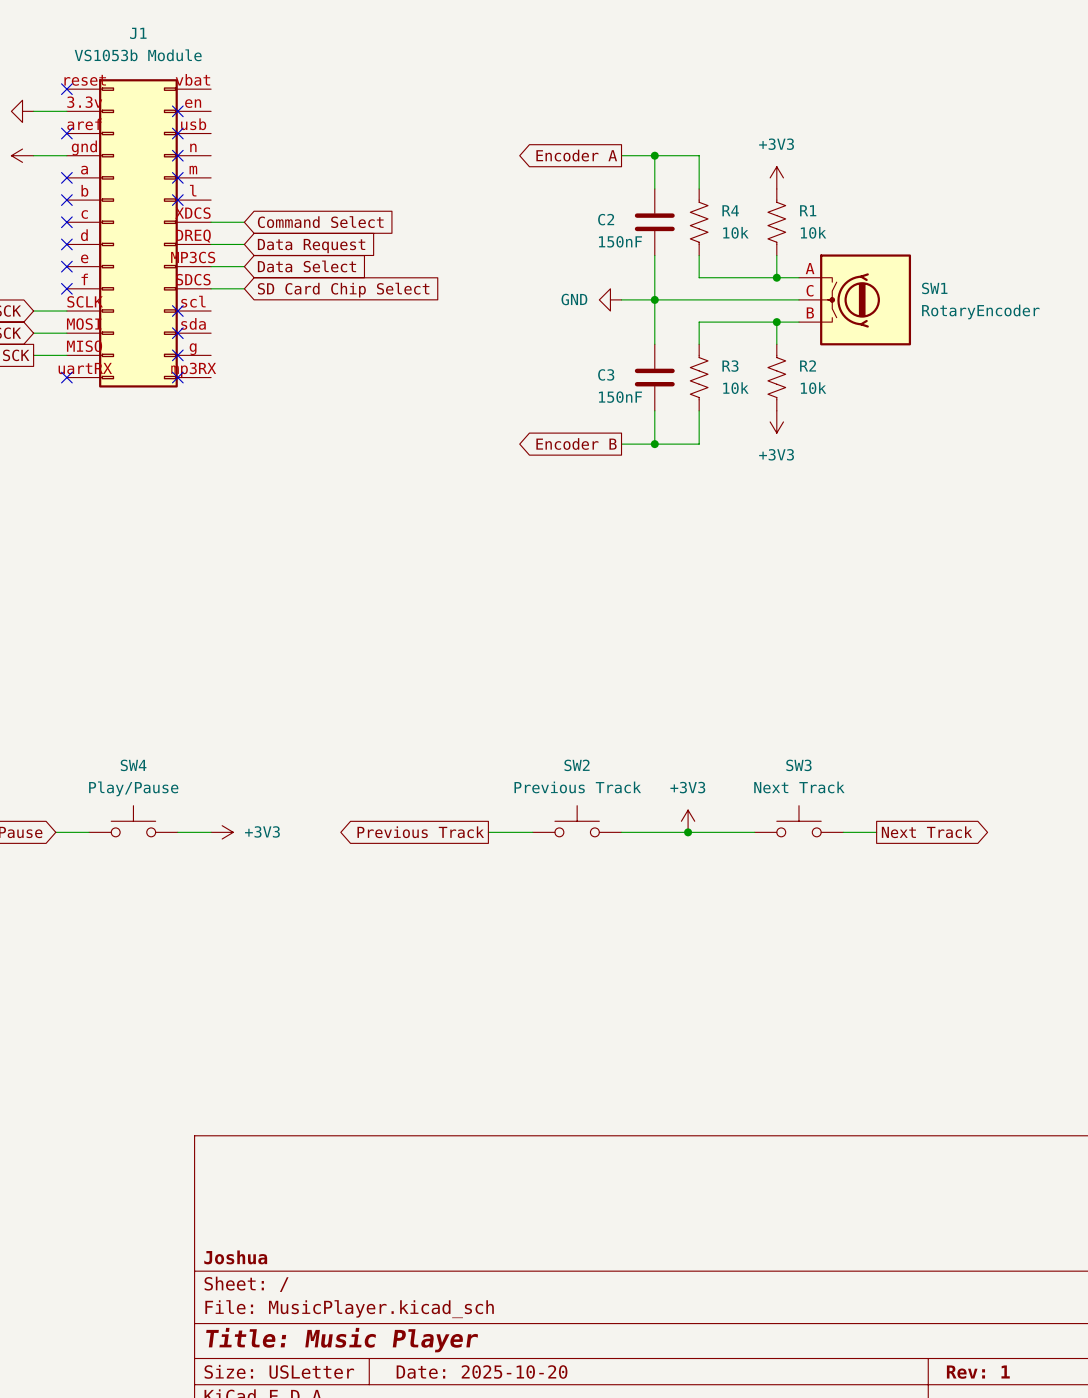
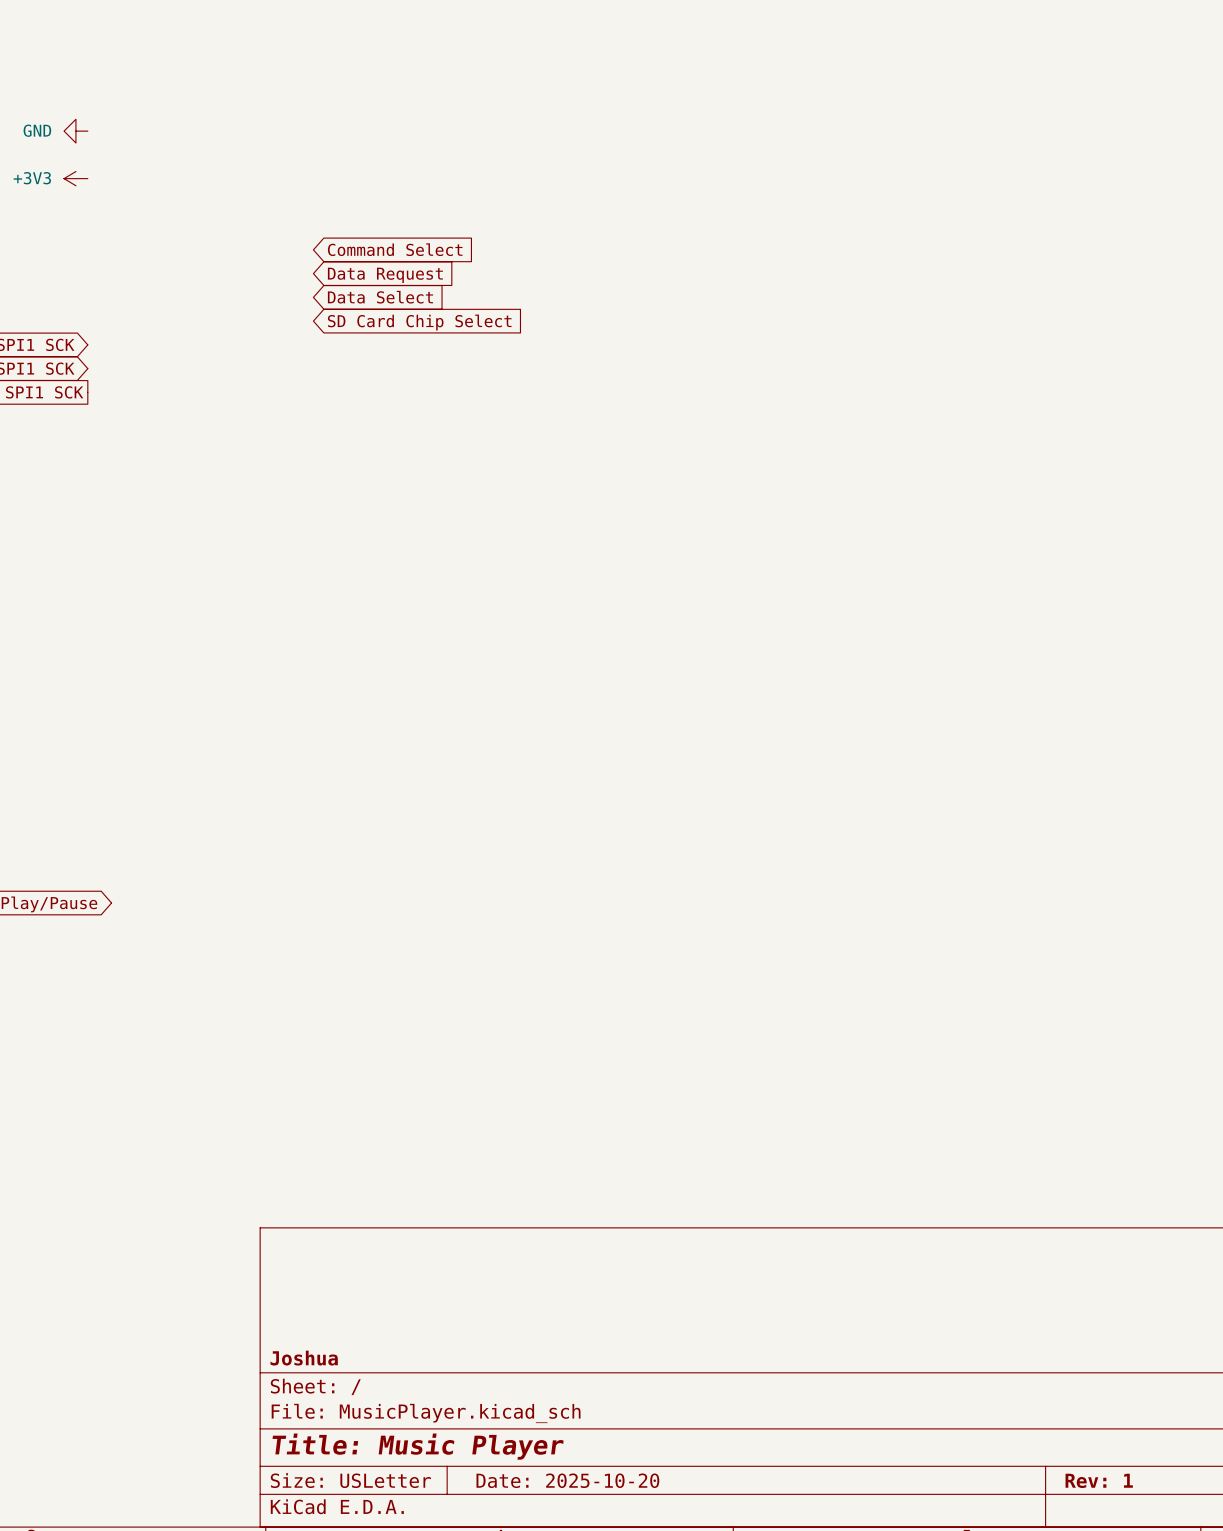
no-connect mark: (66, 89) -> none
wire: (33, 111) (66, 111) -> none
no-connect mark: (177, 111) -> none
no-connect mark: (66, 133) -> none
no-connect mark: (177, 133) -> none
wire: (33, 155) (66, 155) -> none
no-connect mark: (177, 155) -> none
global label: Encoder A (576, 155) -> none
wire: (621, 155) (699, 155) (699, 188) -> none
wire: (654, 155) (654, 188) -> none
junction: (654, 155) -> none
no-connect mark: (66, 177) -> none
no-connect mark: (177, 177) -> none
power symbol: +3V3 (776, 177) -> none
no-connect mark: (66, 200) -> none
no-connect mark: (177, 200) -> none
no-connect mark: (66, 222) -> none
wire: (211, 222) (244, 222) -> none
C2: 150nF (654, 222) -> none
R4: 10k (699, 222) -> none
R1: 10k (776, 222) -> none
J1: VS1053b Module (138, 233) -> none
no-connect mark: (66, 244) -> none
wire: (211, 244) (244, 244) -> none
wire: (654, 255) (654, 344) -> none
wire: (699, 255) (699, 277) (798, 277) -> none
wire: (776, 255) (776, 277) -> none
no-connect mark: (66, 266) -> none
wire: (211, 266) (244, 266) -> none
junction: (776, 277) -> none
no-connect mark: (66, 288) -> none
wire: (211, 288) (244, 288) -> none
power symbol: GND (610, 299) -> none
wire: (621, 299) (798, 299) -> none
junction: (654, 299) -> none
SW1: RotaryEncoder (855, 299) -> none
wire: (33, 311) (66, 311) -> none
no-connect mark: (177, 311) -> none
wire: (776, 322) (776, 344) -> none
junction: (776, 322) -> none
wire: (798, 322) (699, 322) (699, 344) -> none
wire: (33, 333) (66, 333) -> none
no-connect mark: (177, 333) -> none
wire: (33, 355) (66, 355) -> none
no-connect mark: (177, 355) -> none
no-connect mark: (66, 377) -> none
no-connect mark: (177, 377) -> none
C3: 150nF (654, 377) -> none
R3: 10k (699, 377) -> none
R2: 10k (776, 377) -> none
wire: (654, 410) (654, 444) -> none
wire: (699, 410) (699, 444) (621, 444) -> none
power symbol: +3V3 (776, 421) -> none
global label: Encoder B (576, 443) -> none
junction: (654, 444) -> none
SW4: Play/Pause (133, 821) -> none
SW2: Previous Track (577, 821) -> none
power symbol: +3V3 (688, 821) -> none
SW3: Next Track (798, 821) -> none
wire: (55, 832) (89, 832) -> none
wire: (177, 832) (211, 832) -> none
power symbol: +3V3 (222, 832) -> none
global label: Previous Track (420, 832) -> none
wire: (488, 832) (532, 832) -> none
wire: (621, 832) (754, 832) -> none
junction: (688, 832) -> none
wire: (843, 832) (876, 832) -> none
global label: Next Track (927, 832) -> none

